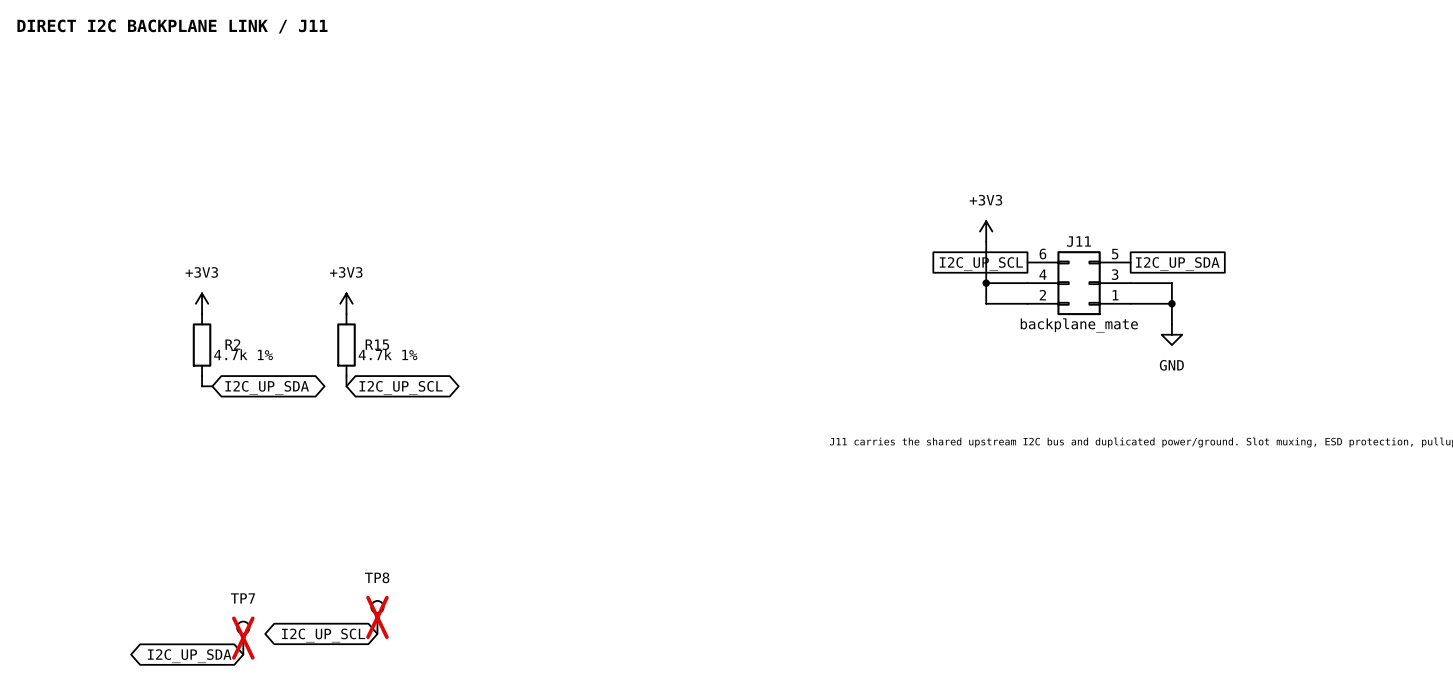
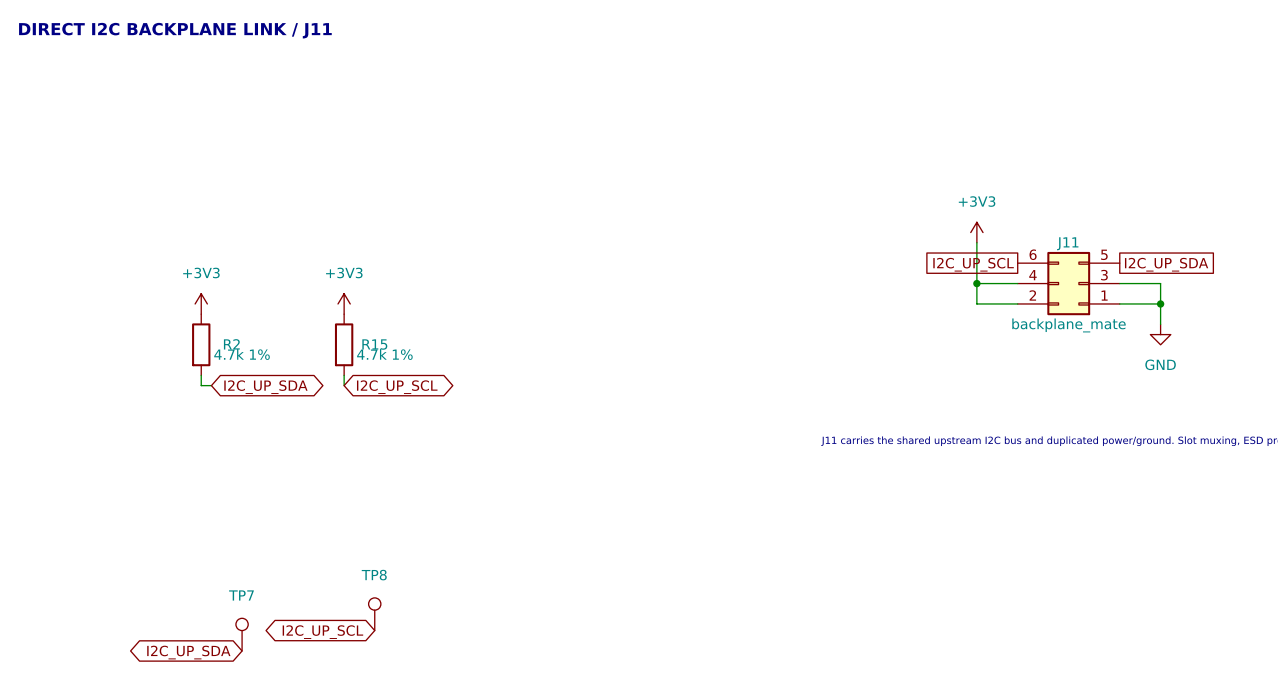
TP8 do-not-place cross: (377, 617) -> none
TP7 do-not-place cross: (243, 638) -> none

